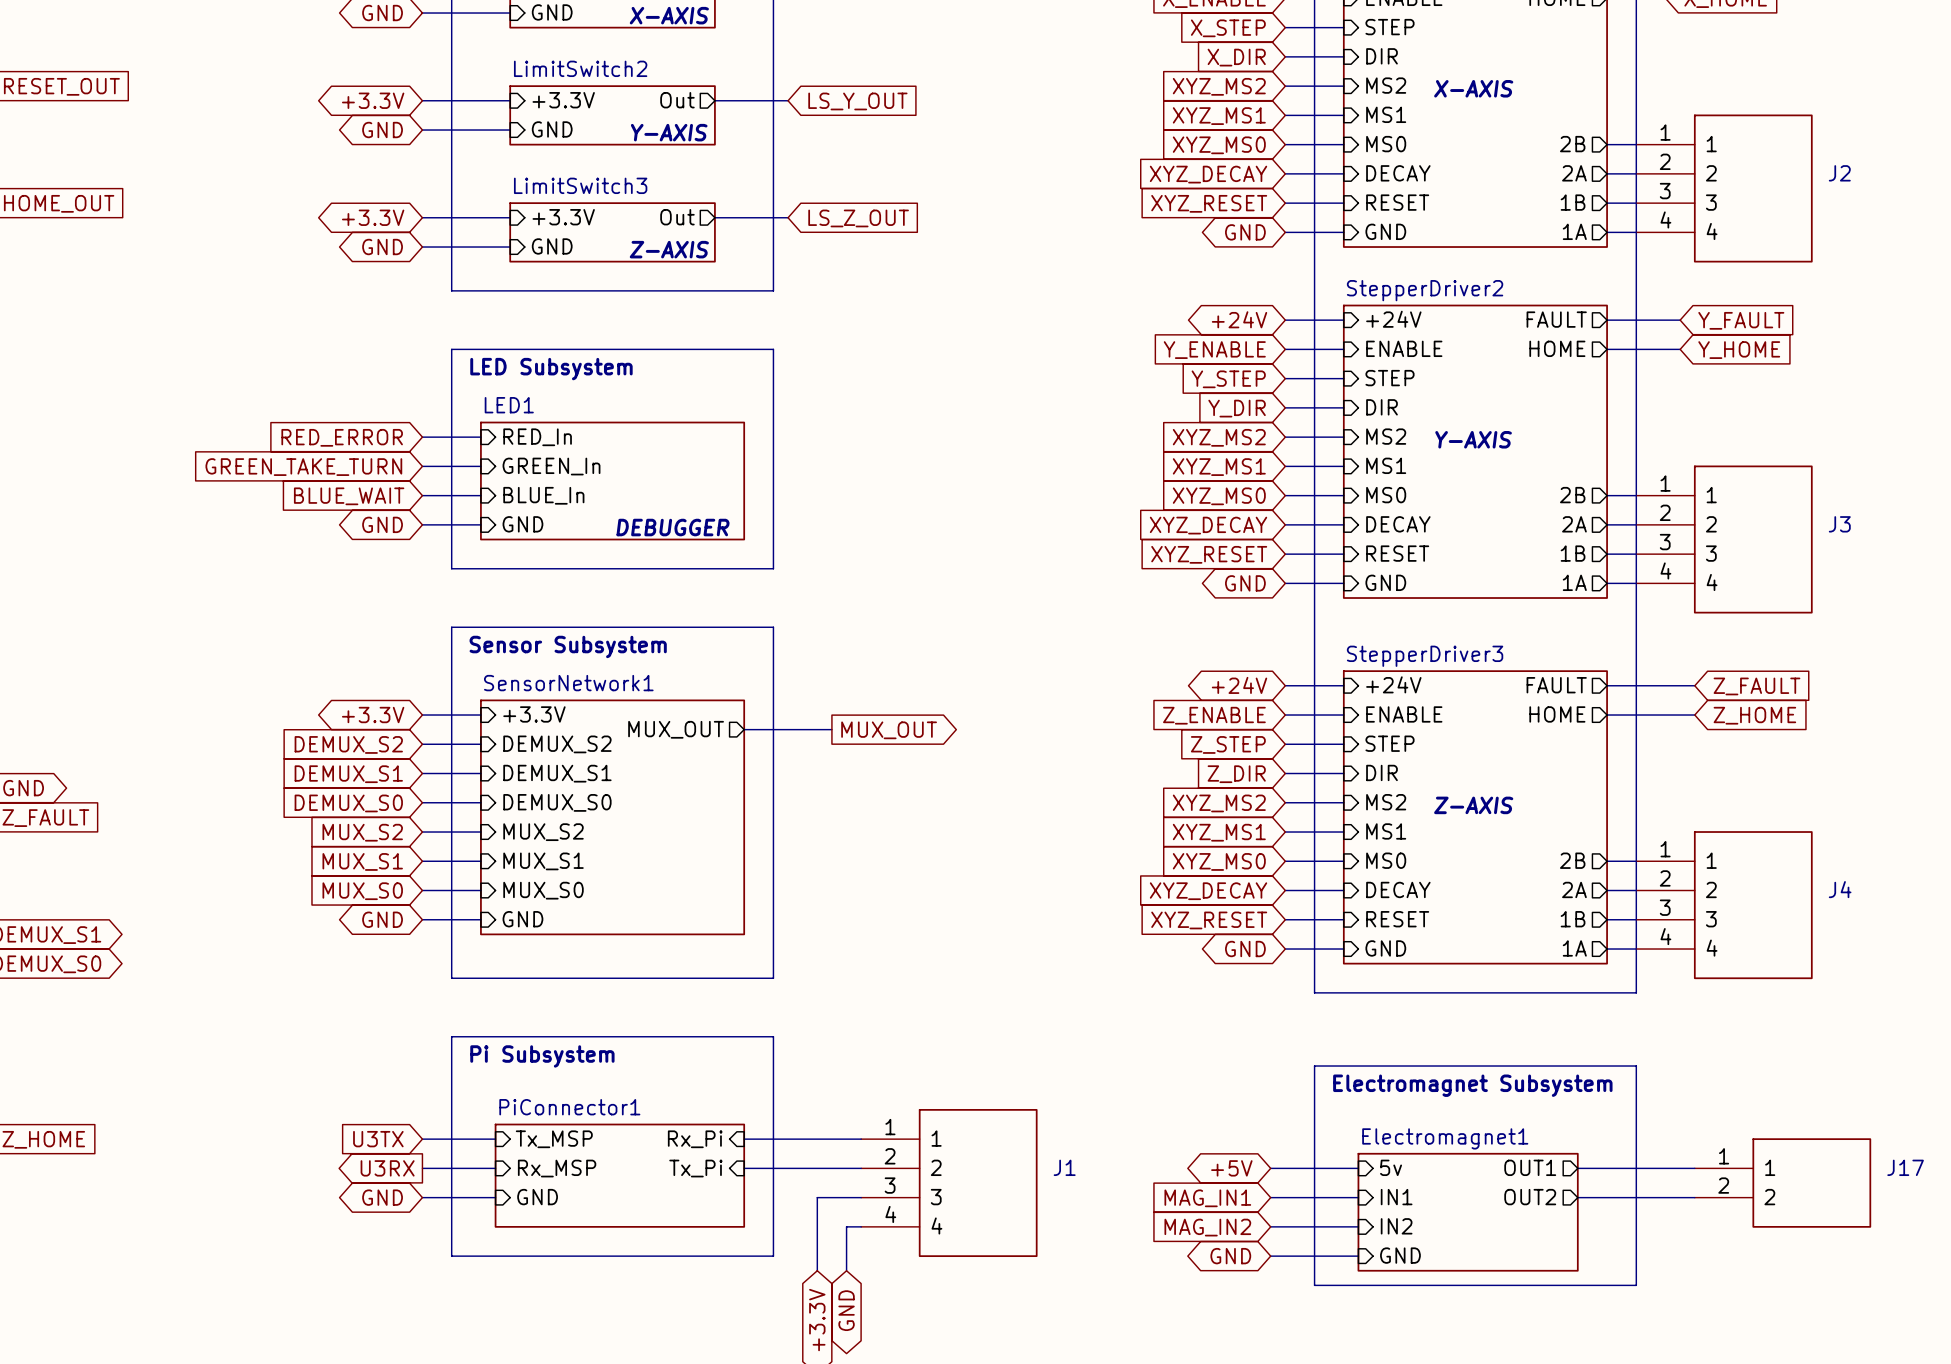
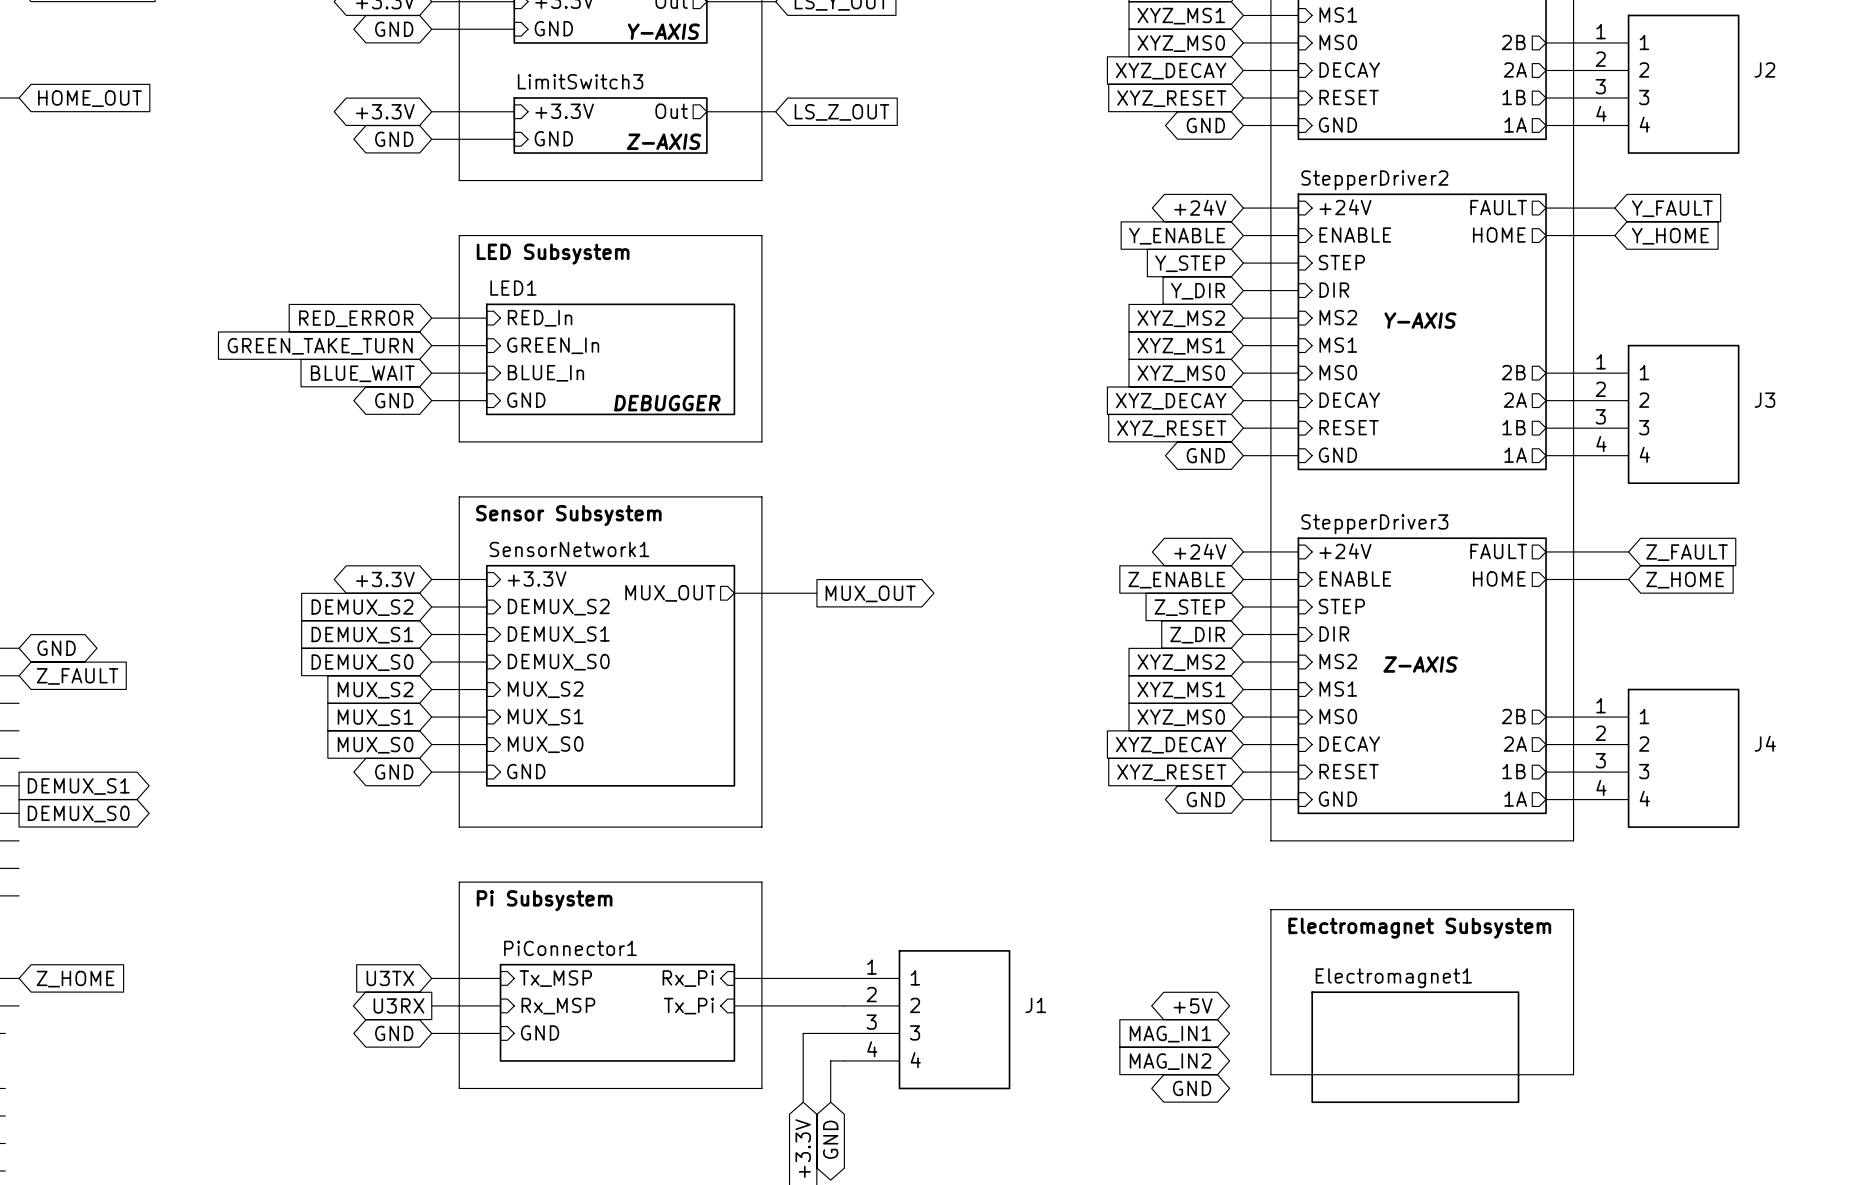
sheet pin: 5v (1391, 1167) -> none
sheet pin: OUT1 (1530, 1167) -> none
wire: (1270, 1168) (1358, 1168) -> none
wire: (1577, 1168) (1694, 1168) -> none
J17: (1783, 1183) -> none
wire: (1270, 1197) (1358, 1197) -> none
sheet pin: IN1 (1396, 1197) -> none
sheet pin: OUT2 (1530, 1197) -> none
wire: (1577, 1197) (1694, 1197) -> none
wire: (1270, 1226) (1358, 1226) -> none
sheet pin: IN2 (1396, 1226) -> none
line: (1314, 1241) (1314, 1285) (1636, 1285) (1636, 1241) -> (1270, 1074) (1573, 1074)
sheet pin: GND (1400, 1255) -> none
wire: (1270, 1256) (1358, 1256) -> none

